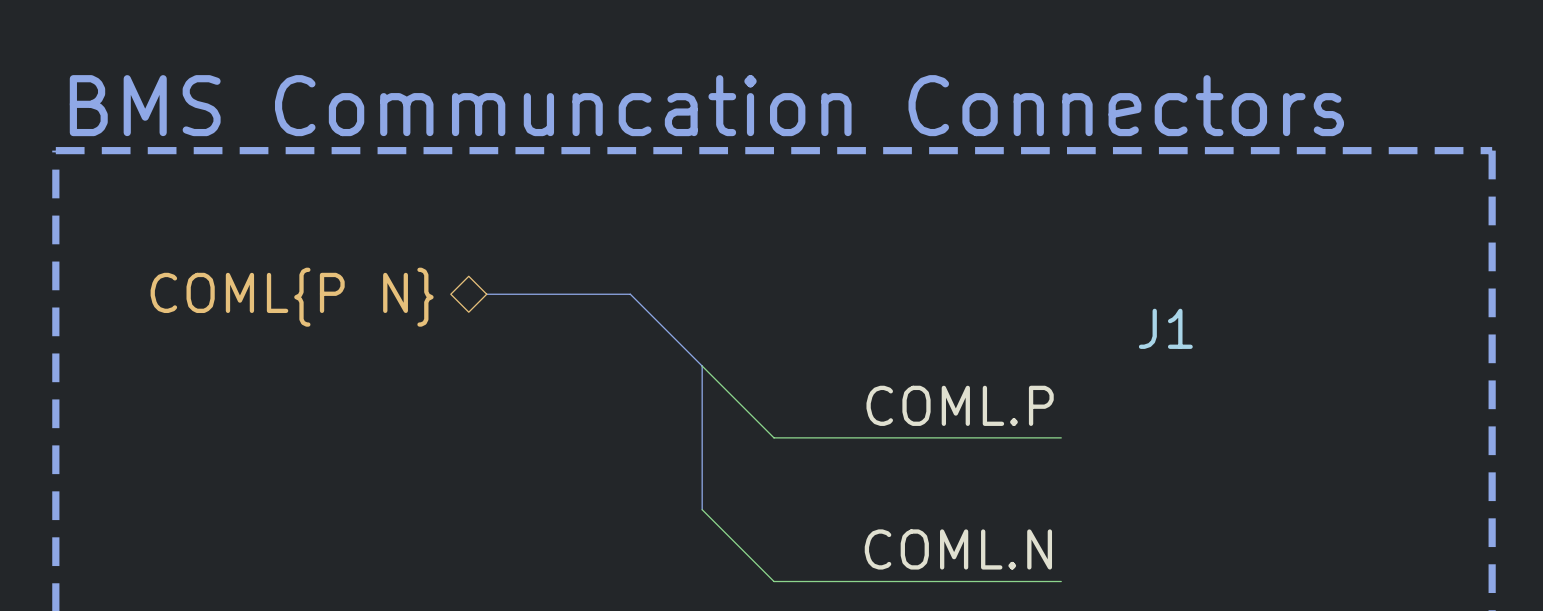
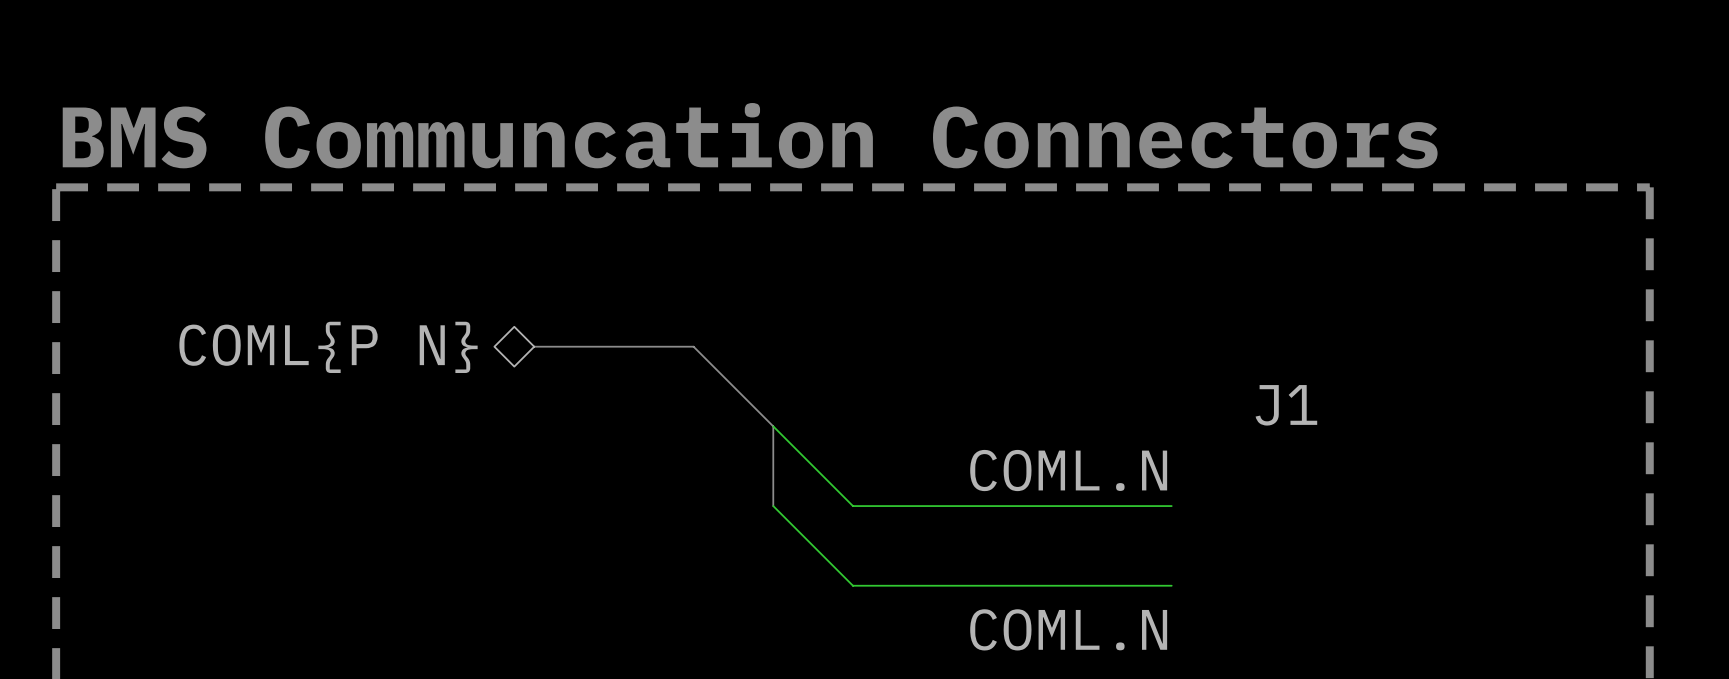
J1 name position: J1 (1165, 328) -> J1 (1286, 405)
label: COML.P (960, 405) -> COML.N (1068, 470)
bus: (702, 437) (702, 509) -> none
wire: (702, 509) (773, 581) (1061, 581) -> (773, 506) (852, 585) (1171, 585)

